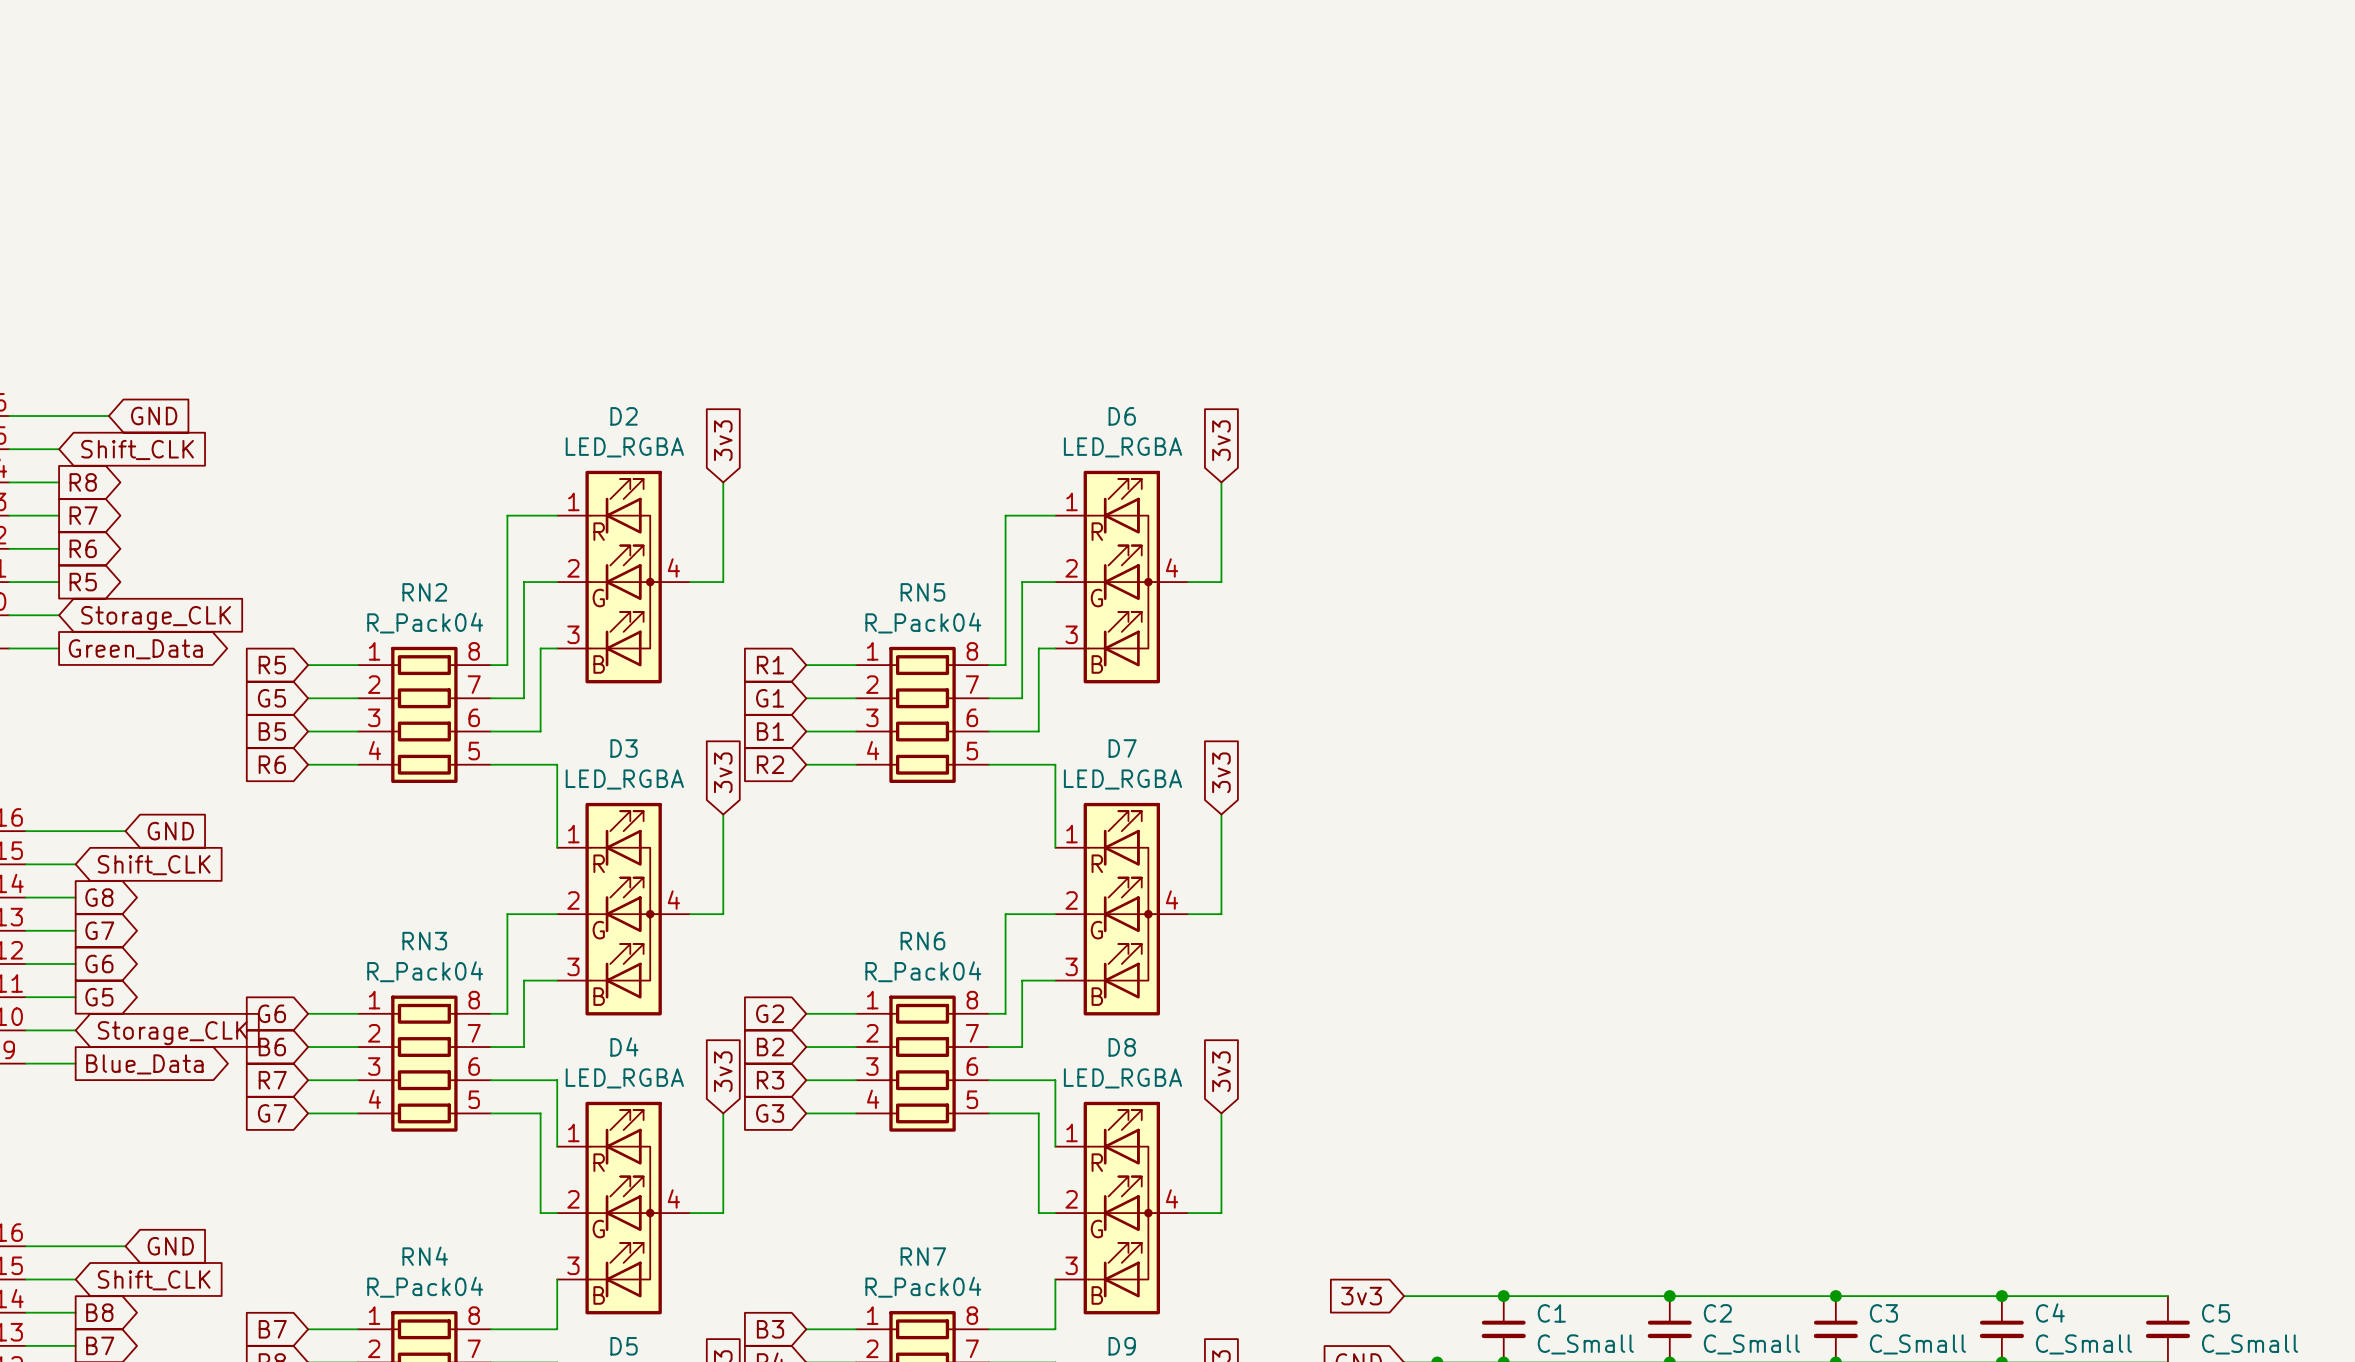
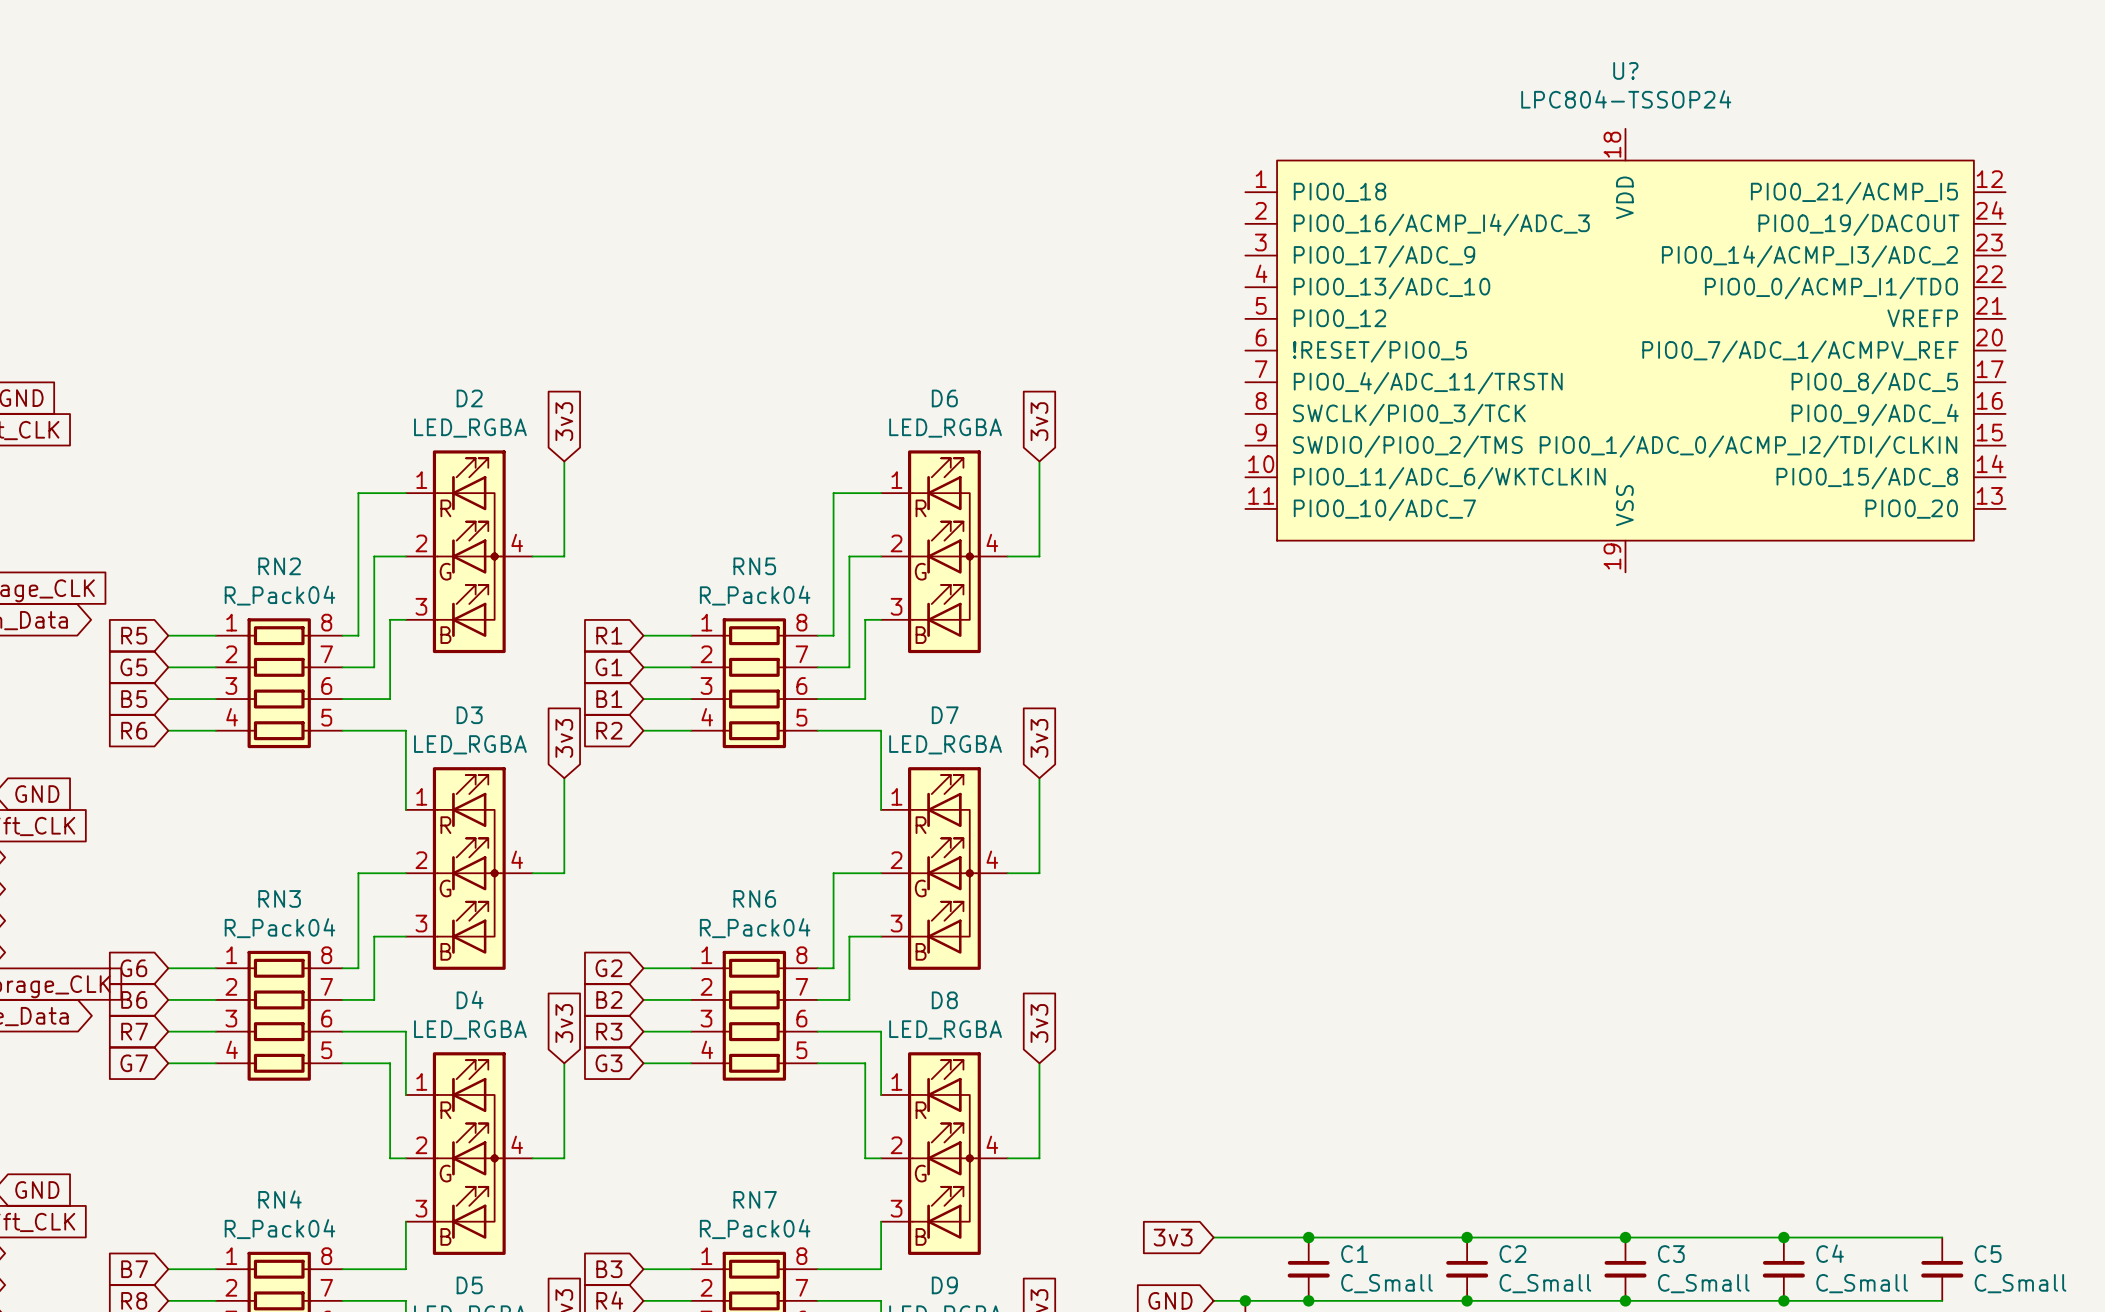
U?: none -> LPC804-TSSOP24 (1625, 350)

